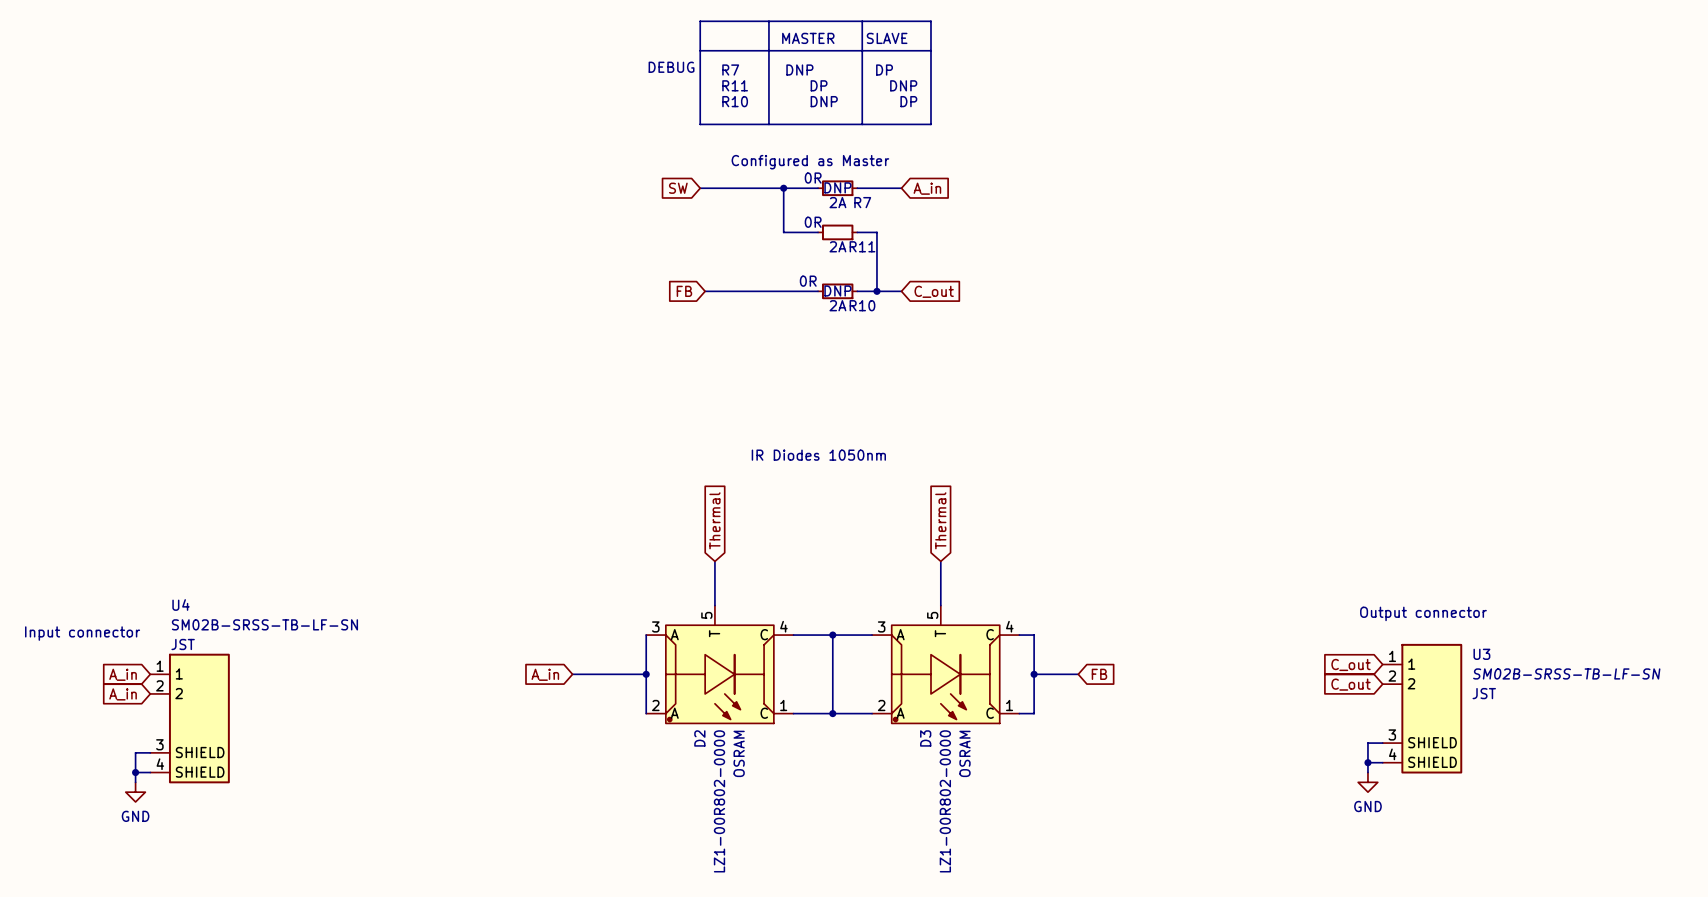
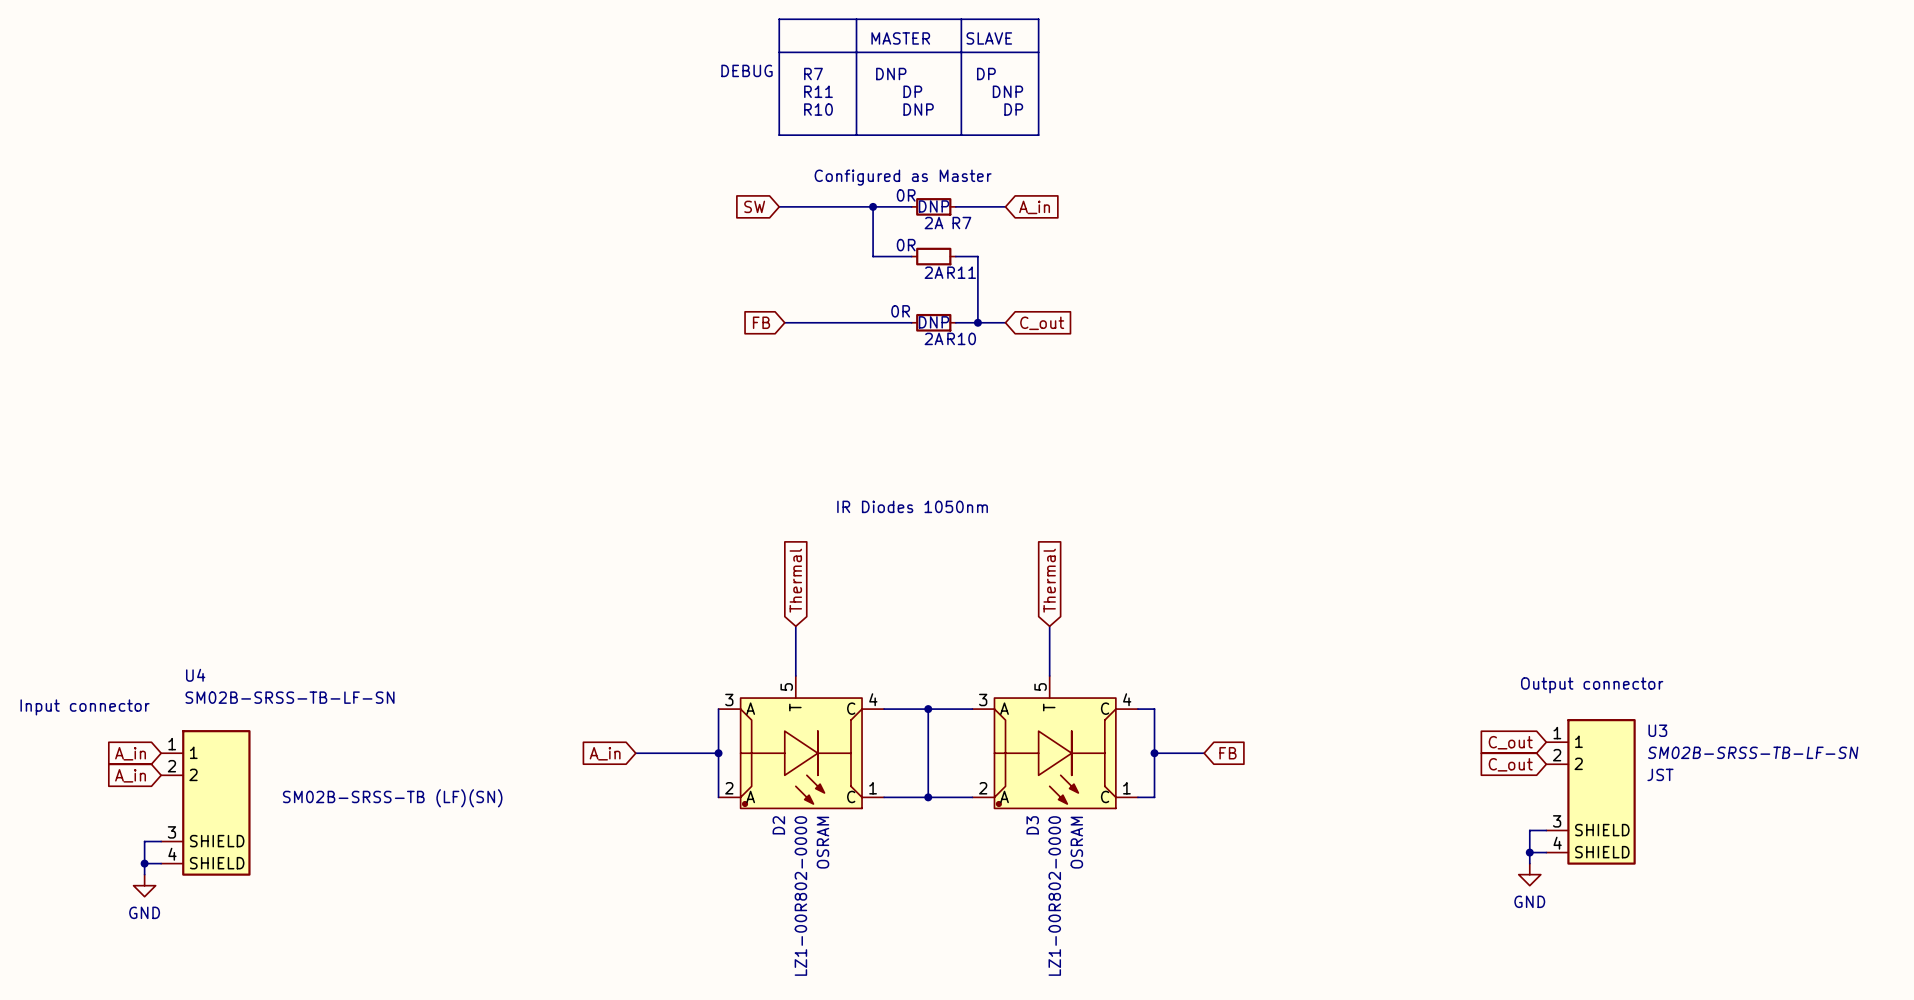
U4 text: JST (183, 644) -> none
U4 text: none -> SM02B-SRSS-TB (LF)(SN) (392, 798)

